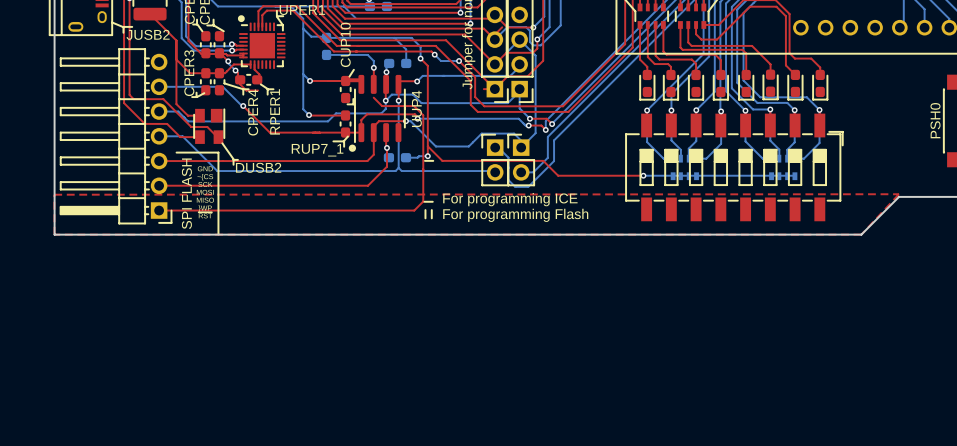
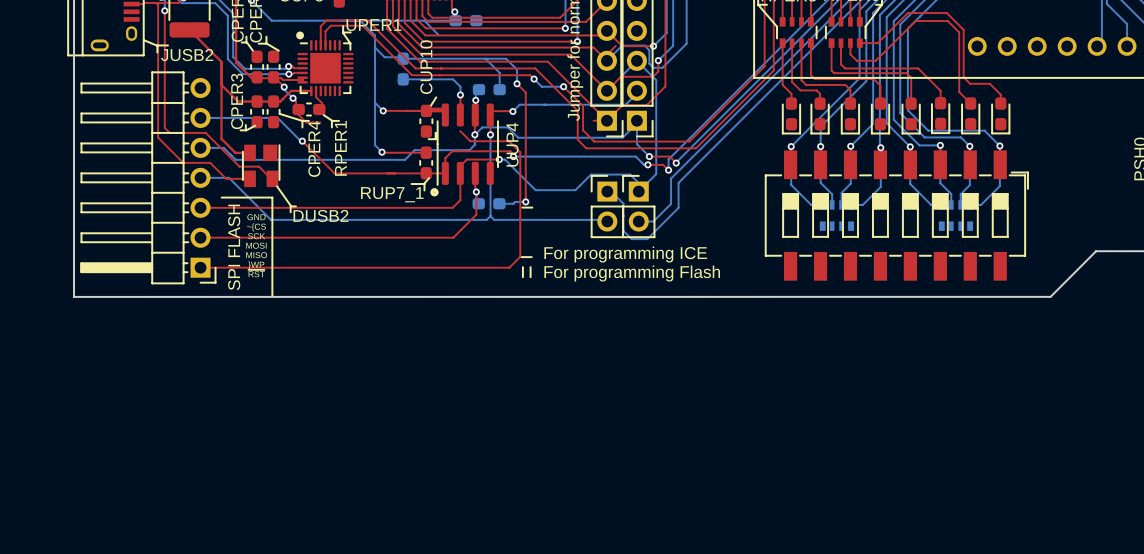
top track: (427, 146) (442, 160) (543, 160) (558, 175) (643, 175) -> none
bottom track: (643, 175) (794, 176) -> none
via: (643, 175) -> none
top zone outline: (898, 194) (54, 194) (54, 234) (861, 234) (898, 194) -> none

